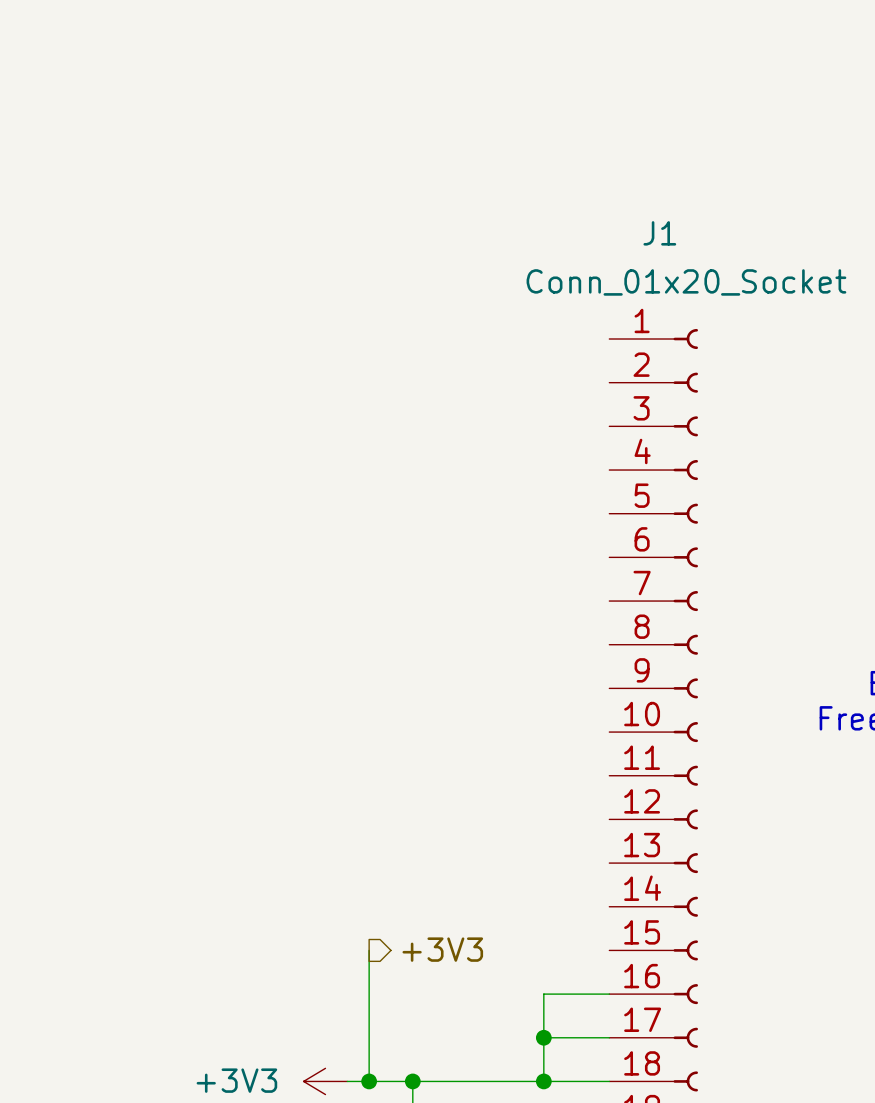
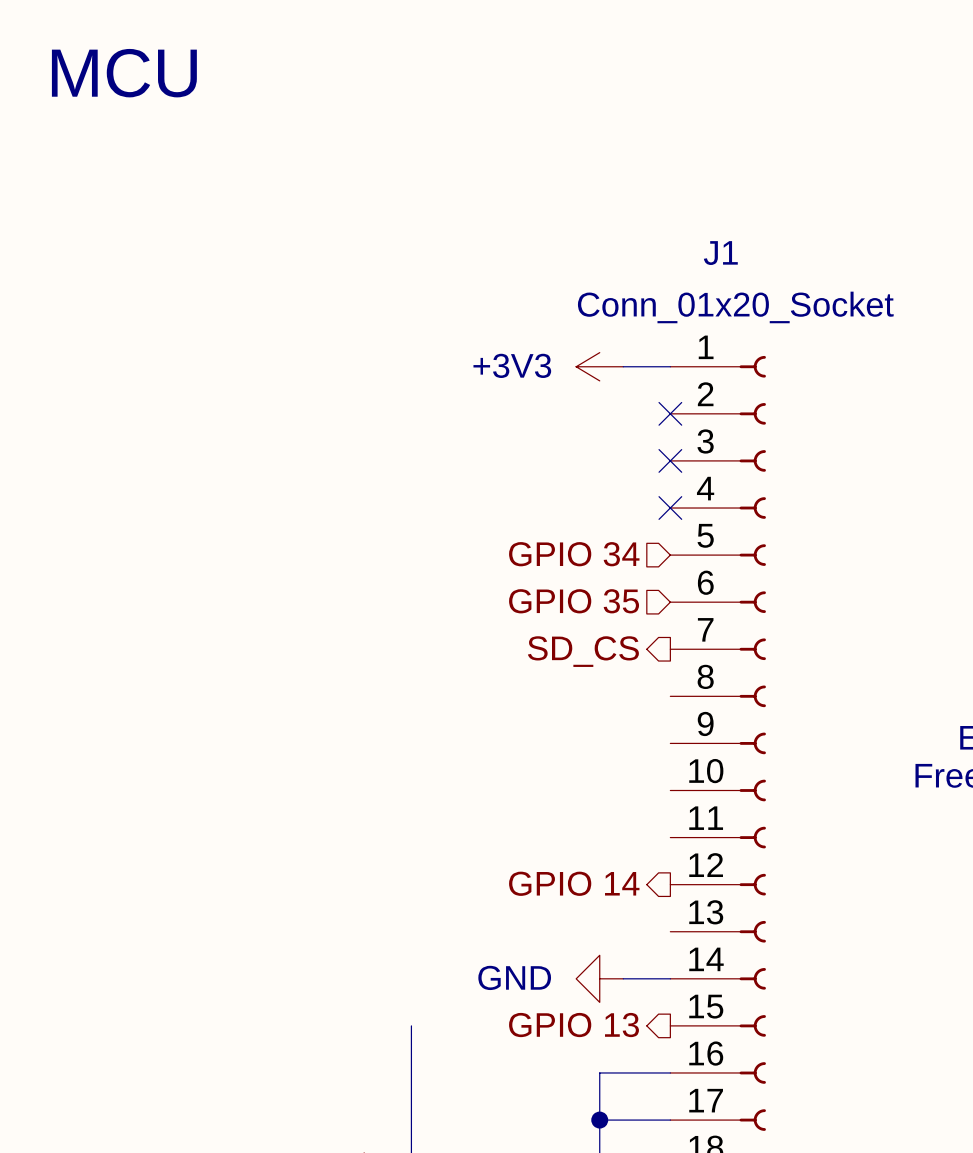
text: none -> MCU (124, 73)
power symbol: none -> +3V3 (599, 366)
wire: none -> (623, 366) (670, 366)
no-connect mark: none -> (670, 413)
no-connect mark: none -> (670, 460)
no-connect mark: none -> (670, 508)
hierarchical label: none -> GPIO 34 (574, 554)
hierarchical label: none -> GPIO 35 (574, 601)
hierarchical label: none -> SD_CS (583, 651)
hierarchical label: none -> GPIO 14 (574, 883)
power symbol: none -> GND (599, 978)
wire: none -> (623, 978) (670, 978)
hierarchical label: +3V3 (442, 949) -> none
hierarchical label: none -> GPIO 13 (574, 1025)

